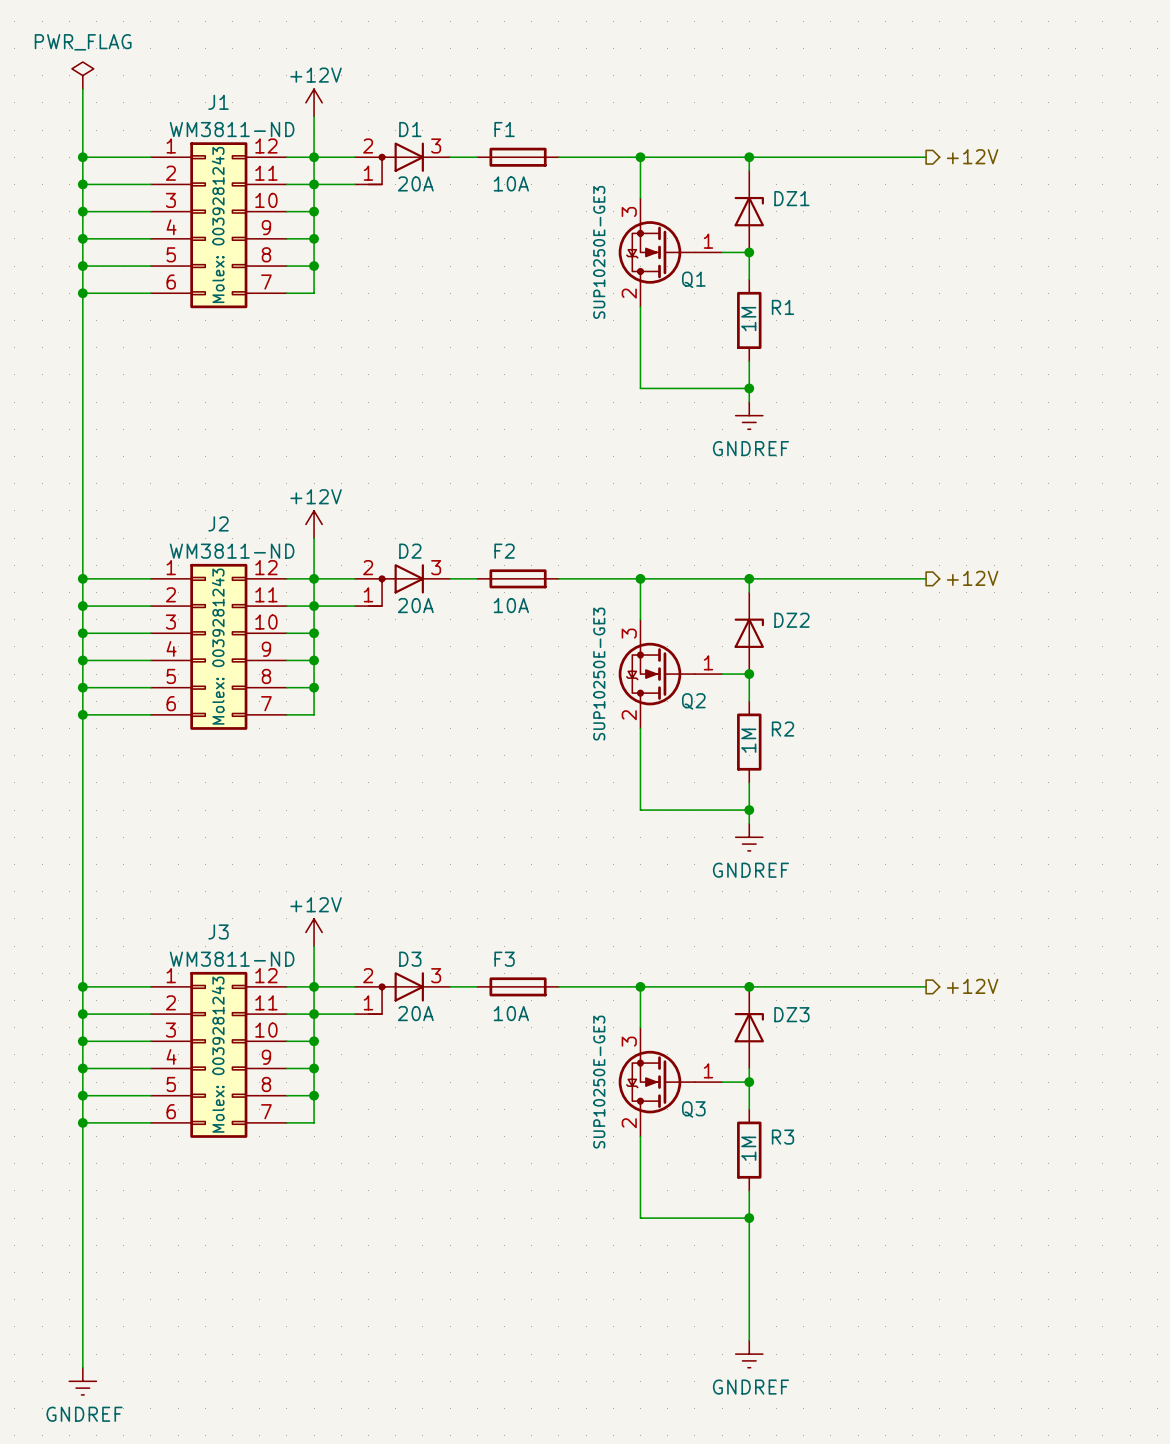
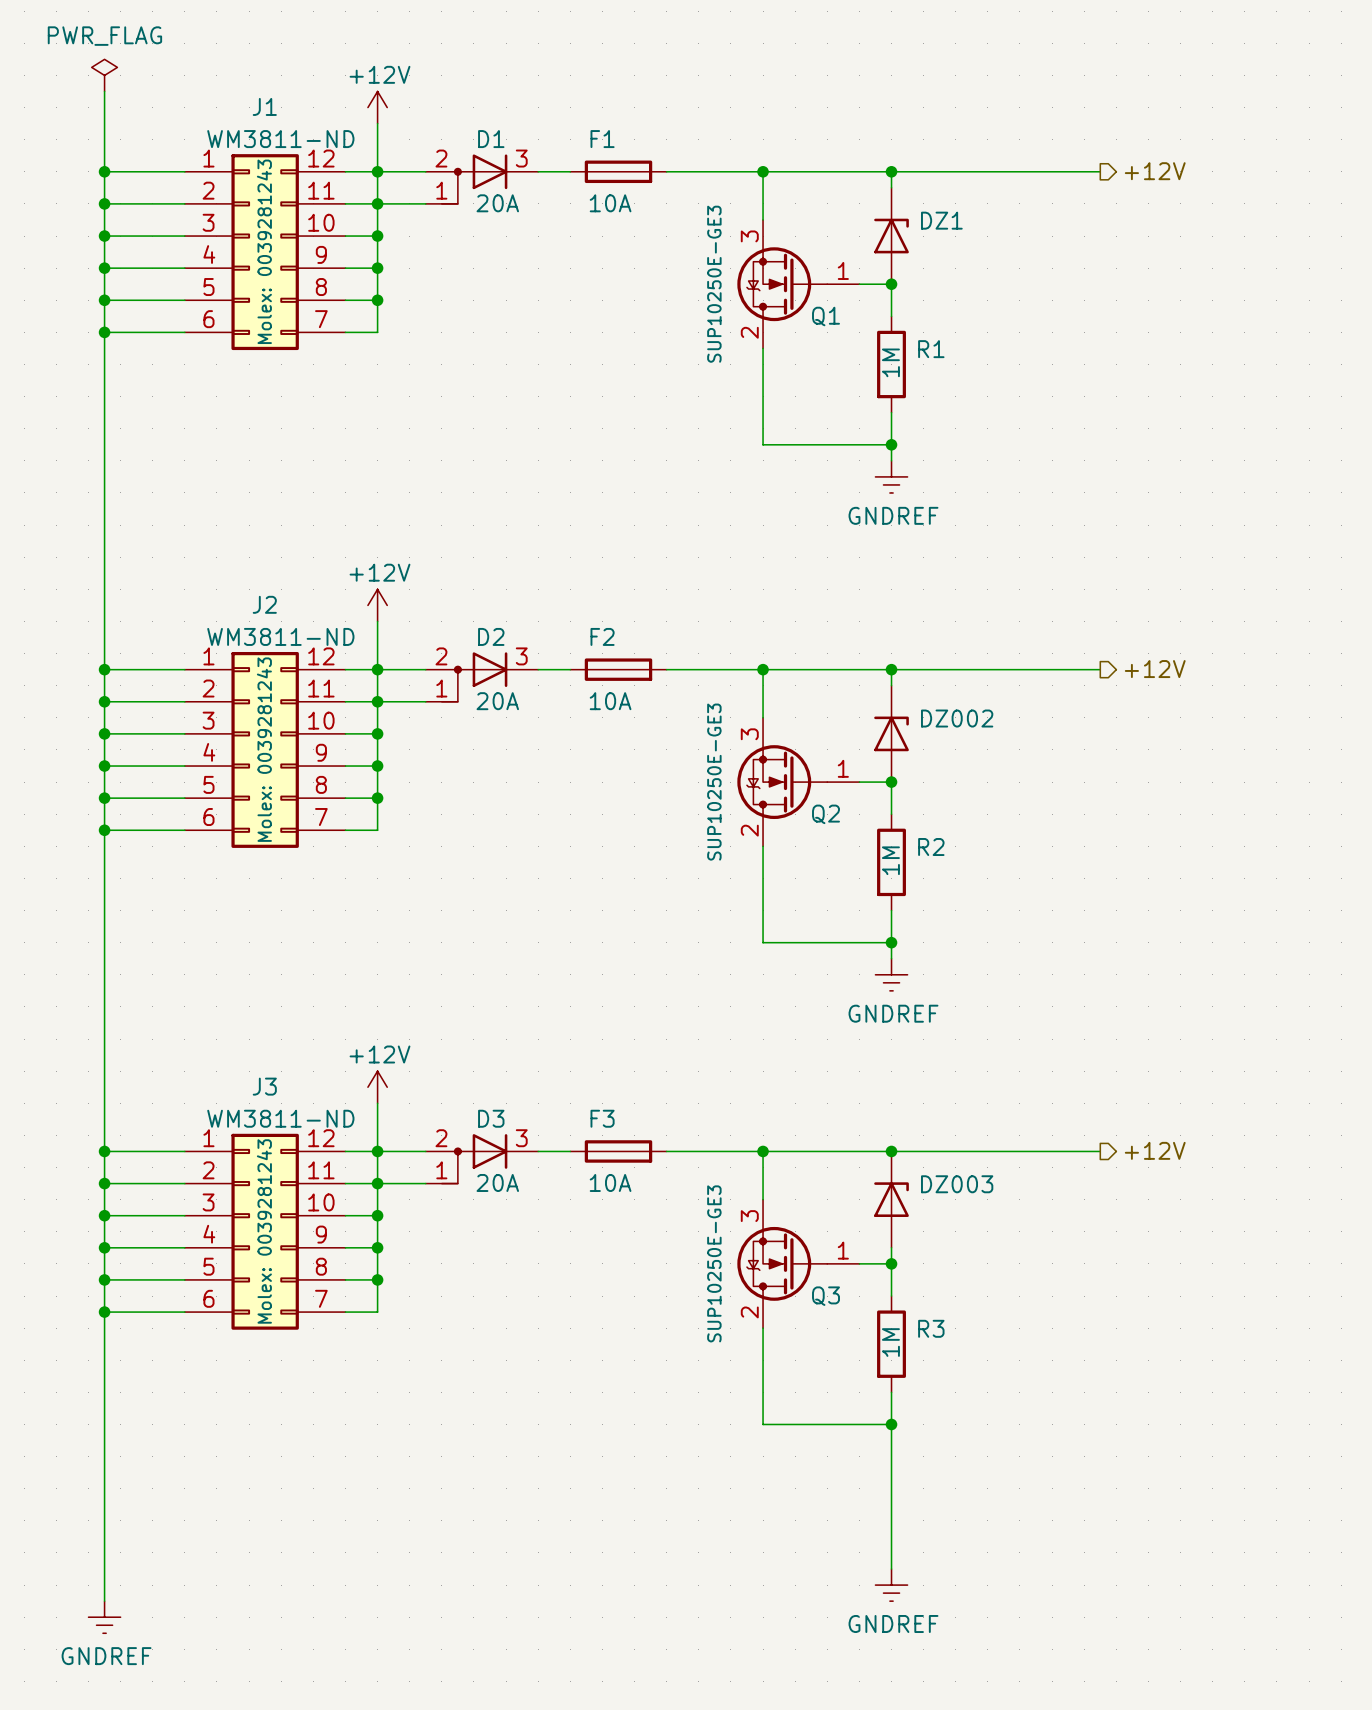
DZ2 name: DZ2 (791, 620) -> DZ002 (957, 718)
DZ3 name: DZ3 (791, 1014) -> DZ003 (957, 1184)

